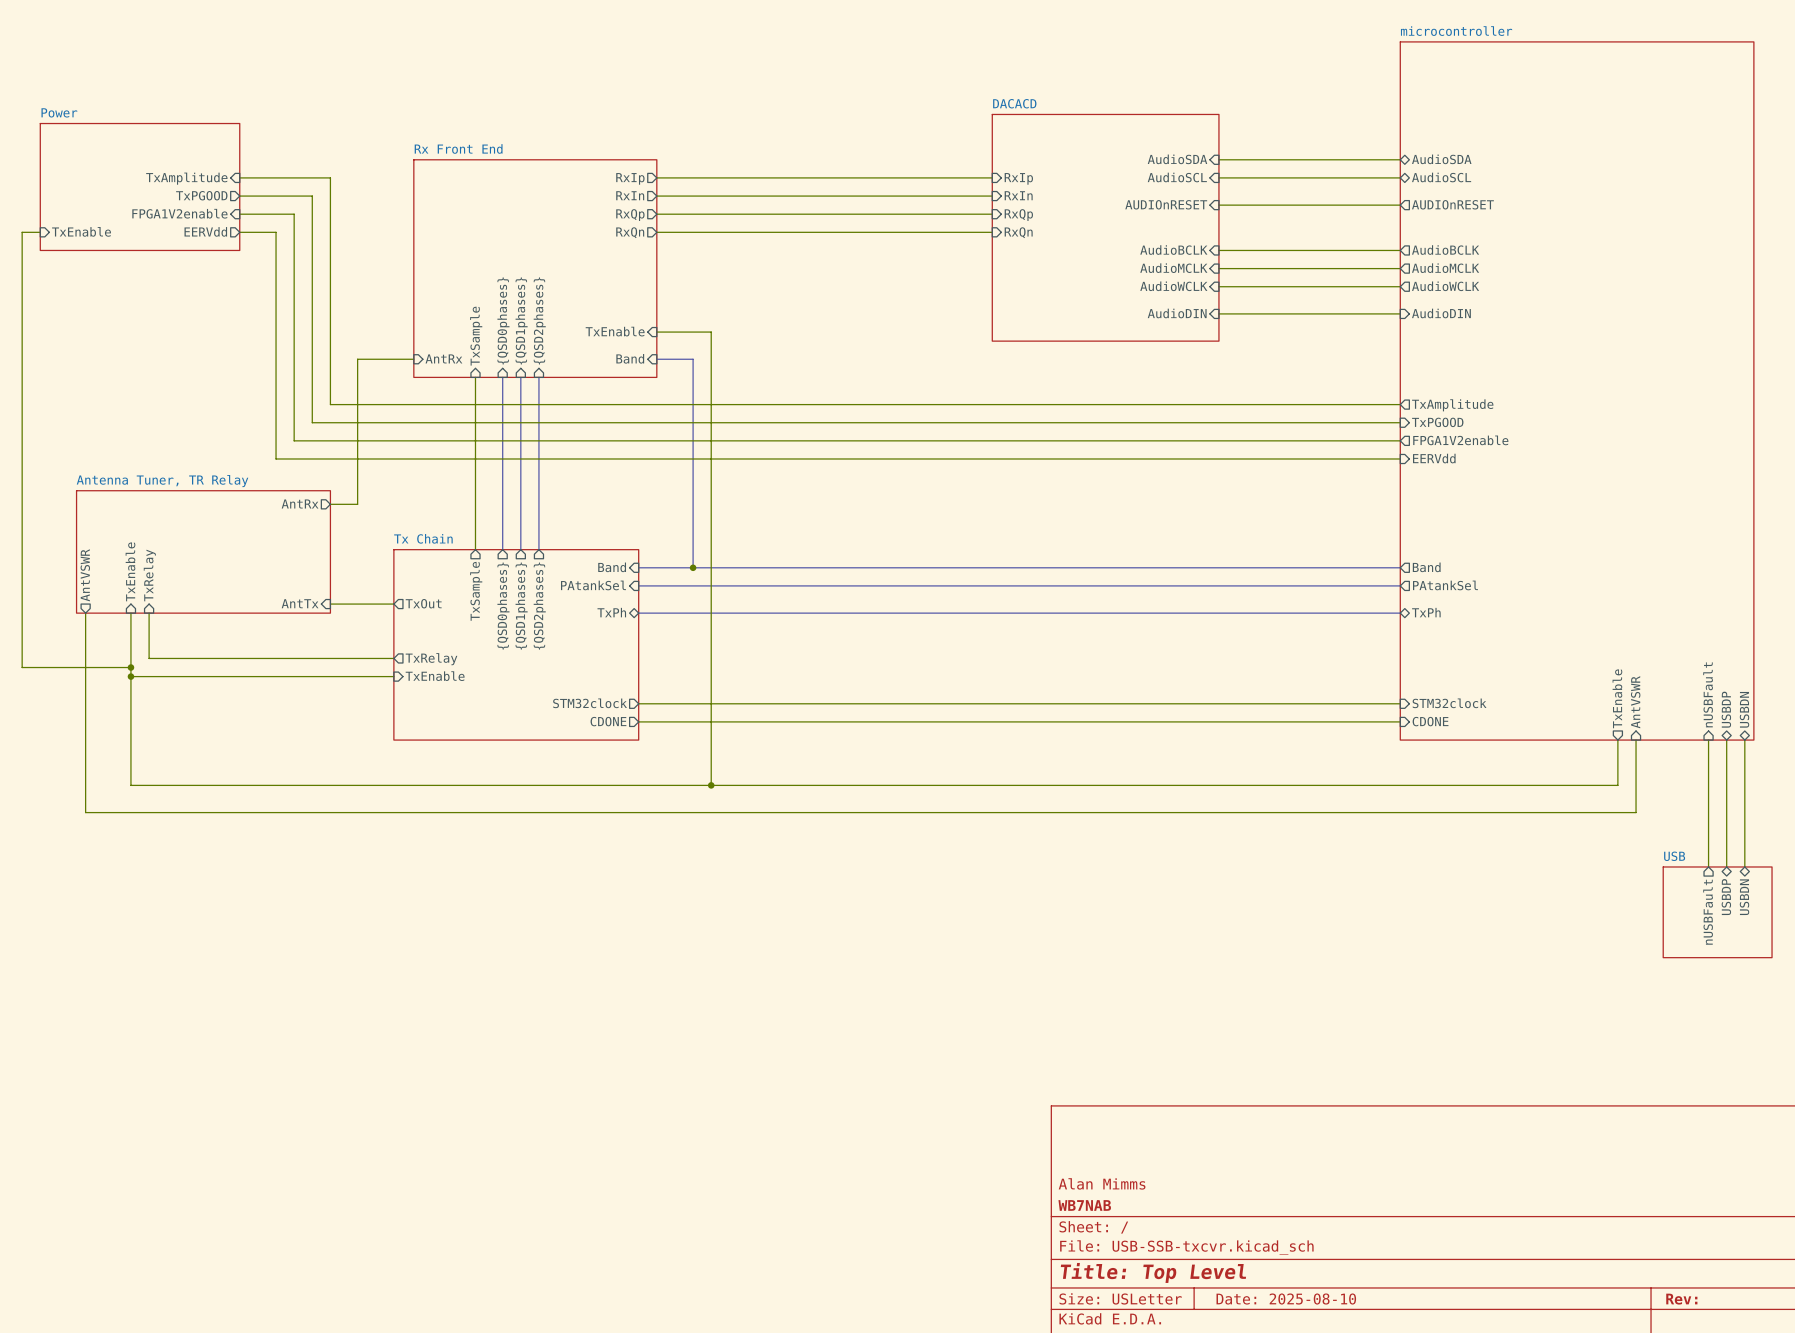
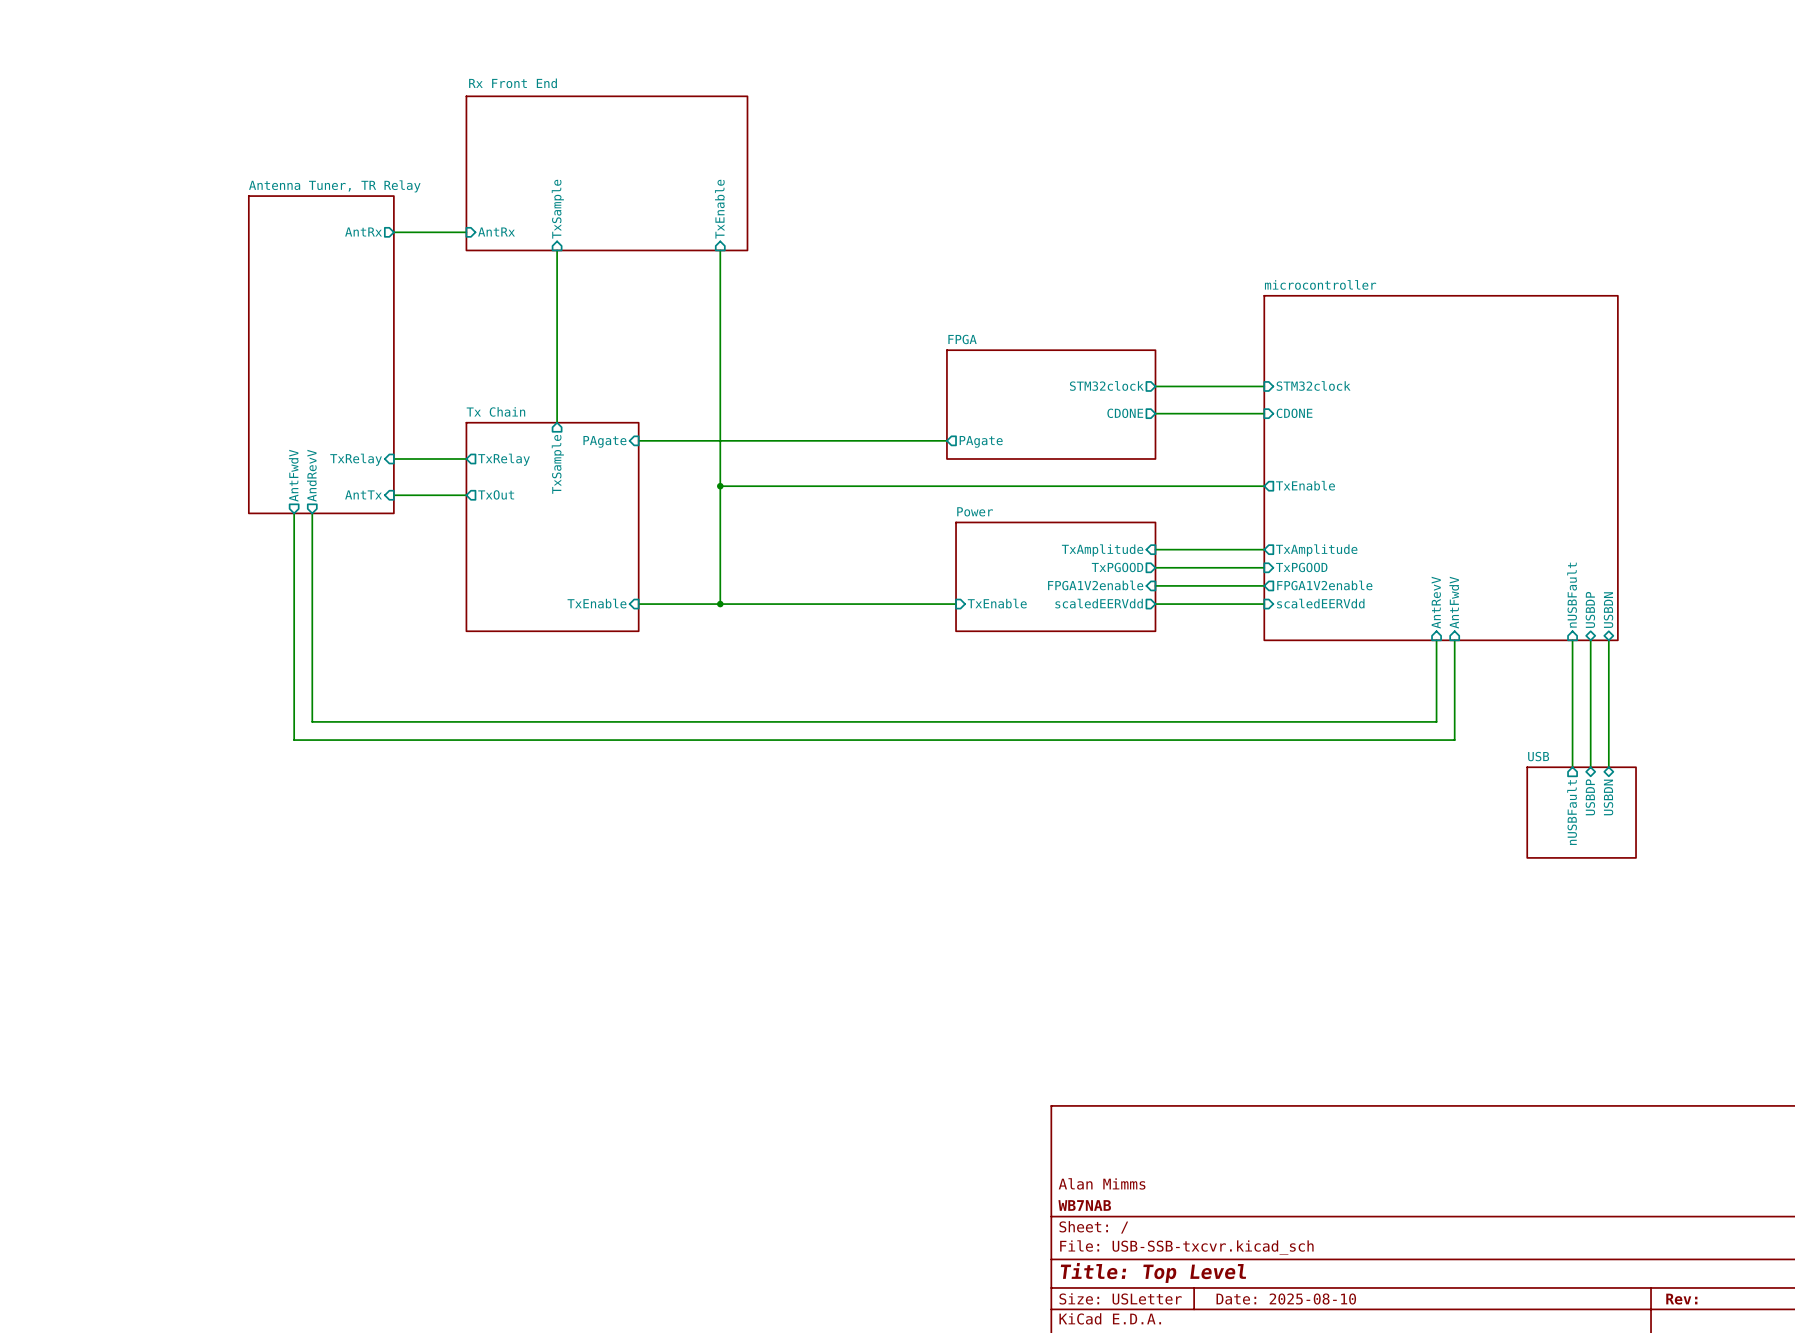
sheet pin: AudioSDA (1177, 159) -> none
wire: (1218, 159) (1400, 159) -> none
sheet pin: AudioSDA (1441, 159) -> none
sheet Rx Front End: none -> (606, 173)
wire: (239, 177) (330, 177) (330, 404) (1400, 404) -> none
wire: (656, 177) (992, 177) -> none
sheet pin: AudioSCL (1177, 177) -> none
wire: (1218, 177) (1400, 177) -> none
sheet pin: AudioSCL (1441, 177) -> none
sheet pin: TxAmplitude (186, 178) -> none
sheet pin: RxIp (630, 178) -> none
sheet pin: RxIp (1018, 178) -> none
sheet Power: (140, 186) -> none
sheet pin: TxPGOOD (201, 195) -> none
sheet pin: RxIn (630, 195) -> none
sheet pin: RxIn (1018, 195) -> none
wire: (239, 196) (312, 196) (312, 422) (1400, 422) -> none
wire: (656, 196) (992, 196) -> none
sheet pin: AUDIOnRESET (1166, 204) -> none
sheet pin: AUDIOnRESET (1452, 204) -> none
wire: (1218, 205) (1400, 205) -> none
sheet pin: none -> TxSample (557, 209)
sheet pin: FPGA1V2enable (179, 213) -> none
wire: (239, 214) (294, 214) (294, 440) (638, 440) -> none
wire: (656, 214) (992, 214) -> none
sheet pin: RxQp (630, 215) -> none
sheet pin: RxQp (1018, 215) -> none
sheet DACACD: (1105, 227) -> none
sheet pin: TxEnable (81, 231) -> none
sheet pin: EERVdd (205, 231) -> none
sheet pin: none -> AntRx (363, 231)
sheet pin: none -> AntRx (496, 231)
wire: (40, 232) (22, 232) (22, 667) (130, 667) -> none
wire: (239, 232) (276, 232) (276, 458) (393, 458) -> none
wire: none -> (393, 232) (466, 232)
sheet pin: RxQn (630, 232) -> none
wire: (656, 232) (992, 232) -> none
sheet pin: RxQn (1018, 232) -> none
wire: none -> (720, 250) (720, 604)
sheet pin: AudioBCLK (1173, 250) -> none
wire: (1218, 250) (1400, 250) -> none
sheet pin: AudioBCLK (1445, 250) -> none
sheet Rx Front End: (535, 268) -> none
sheet pin: AudioMCLK (1173, 268) -> none
wire: (1218, 268) (1400, 268) -> none
sheet pin: AudioMCLK (1445, 268) -> none
sheet pin: AudioWCLK (1173, 286) -> none
wire: (1218, 286) (1400, 286) -> none
sheet pin: AudioWCLK (1445, 286) -> none
sheet pin: AudioDIN (1177, 313) -> none
wire: (1218, 313) (1400, 313) -> none
sheet pin: AudioDIN (1441, 313) -> none
sheet pin: {QSD0phases} (503, 320) -> none
sheet pin: {QSD1phases} (521, 320) -> none
sheet pin: {QSD2phases} (539, 320) -> none
sheet pin rotation: 0° (615, 331) -> 90° clockwise (719, 209)
sheet pin position: TxEnable (615, 331) -> TxEnable (719, 209)
wire: (656, 332) (711, 332) (711, 785) -> none
sheet pin: TxSample (476, 336) -> none
sheet Antenna Tuner, TR Relay: none -> (321, 354)
sheet pin: AntRx (443, 358) -> none
sheet pin: Band (630, 358) -> none
wire: (413, 359) (357, 359) (357, 504) (330, 504) -> none
bus: (656, 359) (693, 359) (693, 567) -> none
wire: (475, 377) (475, 549) -> (557, 250) (557, 422)
bus: (502, 377) (502, 549) -> none
bus: (520, 377) (520, 549) -> none
bus: (538, 377) (538, 549) -> none
sheet pin: none -> STM32clock (1106, 385)
sheet pin: none -> STM32clock (1313, 385)
wire: none -> (1155, 386) (1264, 386)
sheet microcontroller: (1577, 390) -> none
sheet FPGA: none -> (1051, 404)
sheet pin: TxAmplitude (1452, 405) -> none
sheet pin: none -> CDONE (1125, 413)
wire: none -> (1155, 413) (1264, 413)
sheet pin: none -> CDONE (1294, 413)
sheet pin: TxPGOOD (1437, 422) -> none
wire: (946, 440) (1400, 440) -> none
sheet pin: FPGA1V2enable (1460, 440) -> none
sheet pin: none -> PAgate (604, 441)
sheet pin: none -> PAgate (981, 441)
wire: (466, 458) (1400, 458) -> none
sheet pin: EERVdd (1434, 458) -> none
sheet pin: none -> TxRelay (356, 459)
sheet pin: none -> TxRelay (504, 459)
sheet pin: none -> TxSample (557, 464)
sheet microcontroller: none -> (1441, 468)
sheet pin: none -> AntFwdV (293, 475)
sheet pin: none -> TxEnable (1305, 485)
wire: none -> (720, 486) (1264, 486)
junction: none -> (720, 486)
wire: none -> (393, 495) (466, 495)
sheet pin: AntRx (300, 503) -> AndRevV (311, 475)
wire: none -> (294, 513) (294, 740) (1454, 740) (1454, 640)
wire: none -> (312, 513) (312, 721) (638, 721)
sheet Tx Chain: none -> (552, 526)
wire: none -> (1155, 549) (1264, 549)
sheet pin: none -> TxAmplitude (1102, 550)
sheet pin: none -> TxAmplitude (1316, 550)
sheet Antenna Tuner, TR Relay: (203, 551) -> none
sheet pin: Band (612, 567) -> none
bus: (638, 567) (1400, 567) -> none
junction: (693, 567) -> none
sheet pin: none -> TxPGOOD (1117, 567)
sheet pin: none -> TxPGOOD (1301, 567)
sheet pin: Band (1426, 567) -> none
sheet pin: TxEnable (130, 571) -> none
sheet pin: AntVSWR (85, 575) -> none
sheet pin: TxRelay (149, 575) -> none
sheet Power: none -> (1055, 576)
sheet pin: PAtankSel (593, 585) -> none
bus: (638, 585) (1400, 585) -> none
sheet pin: none -> FPGA1V2enable (1095, 585)
sheet pin: none -> FPGA1V2enable (1324, 585)
sheet pin: PAtankSel (1445, 585) -> none
sheet pin: TxSample (476, 591) -> none
sheet pin: none -> nUSBFault (1572, 595)
sheet pin: none -> AntRevV (1436, 602)
sheet pin: none -> AntFwdV (1454, 602)
sheet pin position: AntTx (300, 603) -> AntTx (363, 494)
sheet pin position: TxOut (423, 603) -> TxOut (496, 494)
sheet pin: none -> TxEnable (597, 603)
sheet pin: none -> TxEnable (997, 603)
sheet pin: none -> scaledEERVdd (1099, 603)
sheet pin: none -> scaledEERVdd (1320, 603)
wire: (330, 604) (393, 604) -> none
wire: none -> (638, 604) (956, 604)
junction: none -> (720, 604)
wire: none -> (1155, 604) (1264, 604)
sheet pin: {QSD0phases} (503, 606) -> none
sheet pin: {QSD1phases} (521, 606) -> none
sheet pin: {QSD2phases} (539, 606) -> none
sheet pin: none -> USBDP (1590, 609)
sheet pin: none -> USBDN (1608, 610)
sheet pin: TxPh (611, 612) -> none
sheet pin: TxPh (1426, 612) -> none
wire: (85, 613) (85, 812) (1636, 812) (1636, 740) -> none
wire: (130, 613) (130, 785) (1617, 785) (1617, 740) -> none
wire: (149, 613) (149, 658) (393, 658) -> none
bus: (638, 613) (1400, 613) -> none
wire: none -> (1436, 640) (1436, 721) (1400, 721)
sheet Tx Chain: (516, 644) -> none
sheet pin: TxRelay (431, 659) -> none
junction: (130, 667) -> none
wire: (130, 676) (393, 676) -> none
junction: (130, 676) -> none
sheet pin: TxEnable (435, 676) -> none
sheet pin: nUSBFault (1708, 694) -> none
sheet pin: TxEnable (1617, 698) -> none
sheet pin: AntVSWR (1635, 702) -> none
sheet pin: STM32clock (590, 703) -> none
wire: (638, 703) (1400, 703) -> none
sheet pin: STM32clock (1449, 703) -> none
sheet pin: USBDP (1726, 709) -> none
sheet pin: USBDN (1744, 709) -> none
sheet pin: CDONE (608, 721) -> none
sheet pin: CDONE (1430, 721) -> none
wire: (1708, 740) (1708, 866) -> (1572, 640) (1572, 767)
wire: (1726, 740) (1726, 866) -> (1590, 640) (1590, 767)
wire: (1744, 740) (1744, 866) -> (1608, 640) (1608, 767)
junction: (711, 785) -> none
sheet pin: none -> USBDP (1590, 797)
sheet pin: none -> USBDN (1608, 797)
sheet pin: none -> nUSBFault (1572, 812)
sheet pin: USBDP (1726, 897) -> none
sheet pin: USBDN (1744, 897) -> none
sheet pin: nUSBFault (1708, 912) -> none
sheet USB position: (1717, 912) -> (1581, 812)

